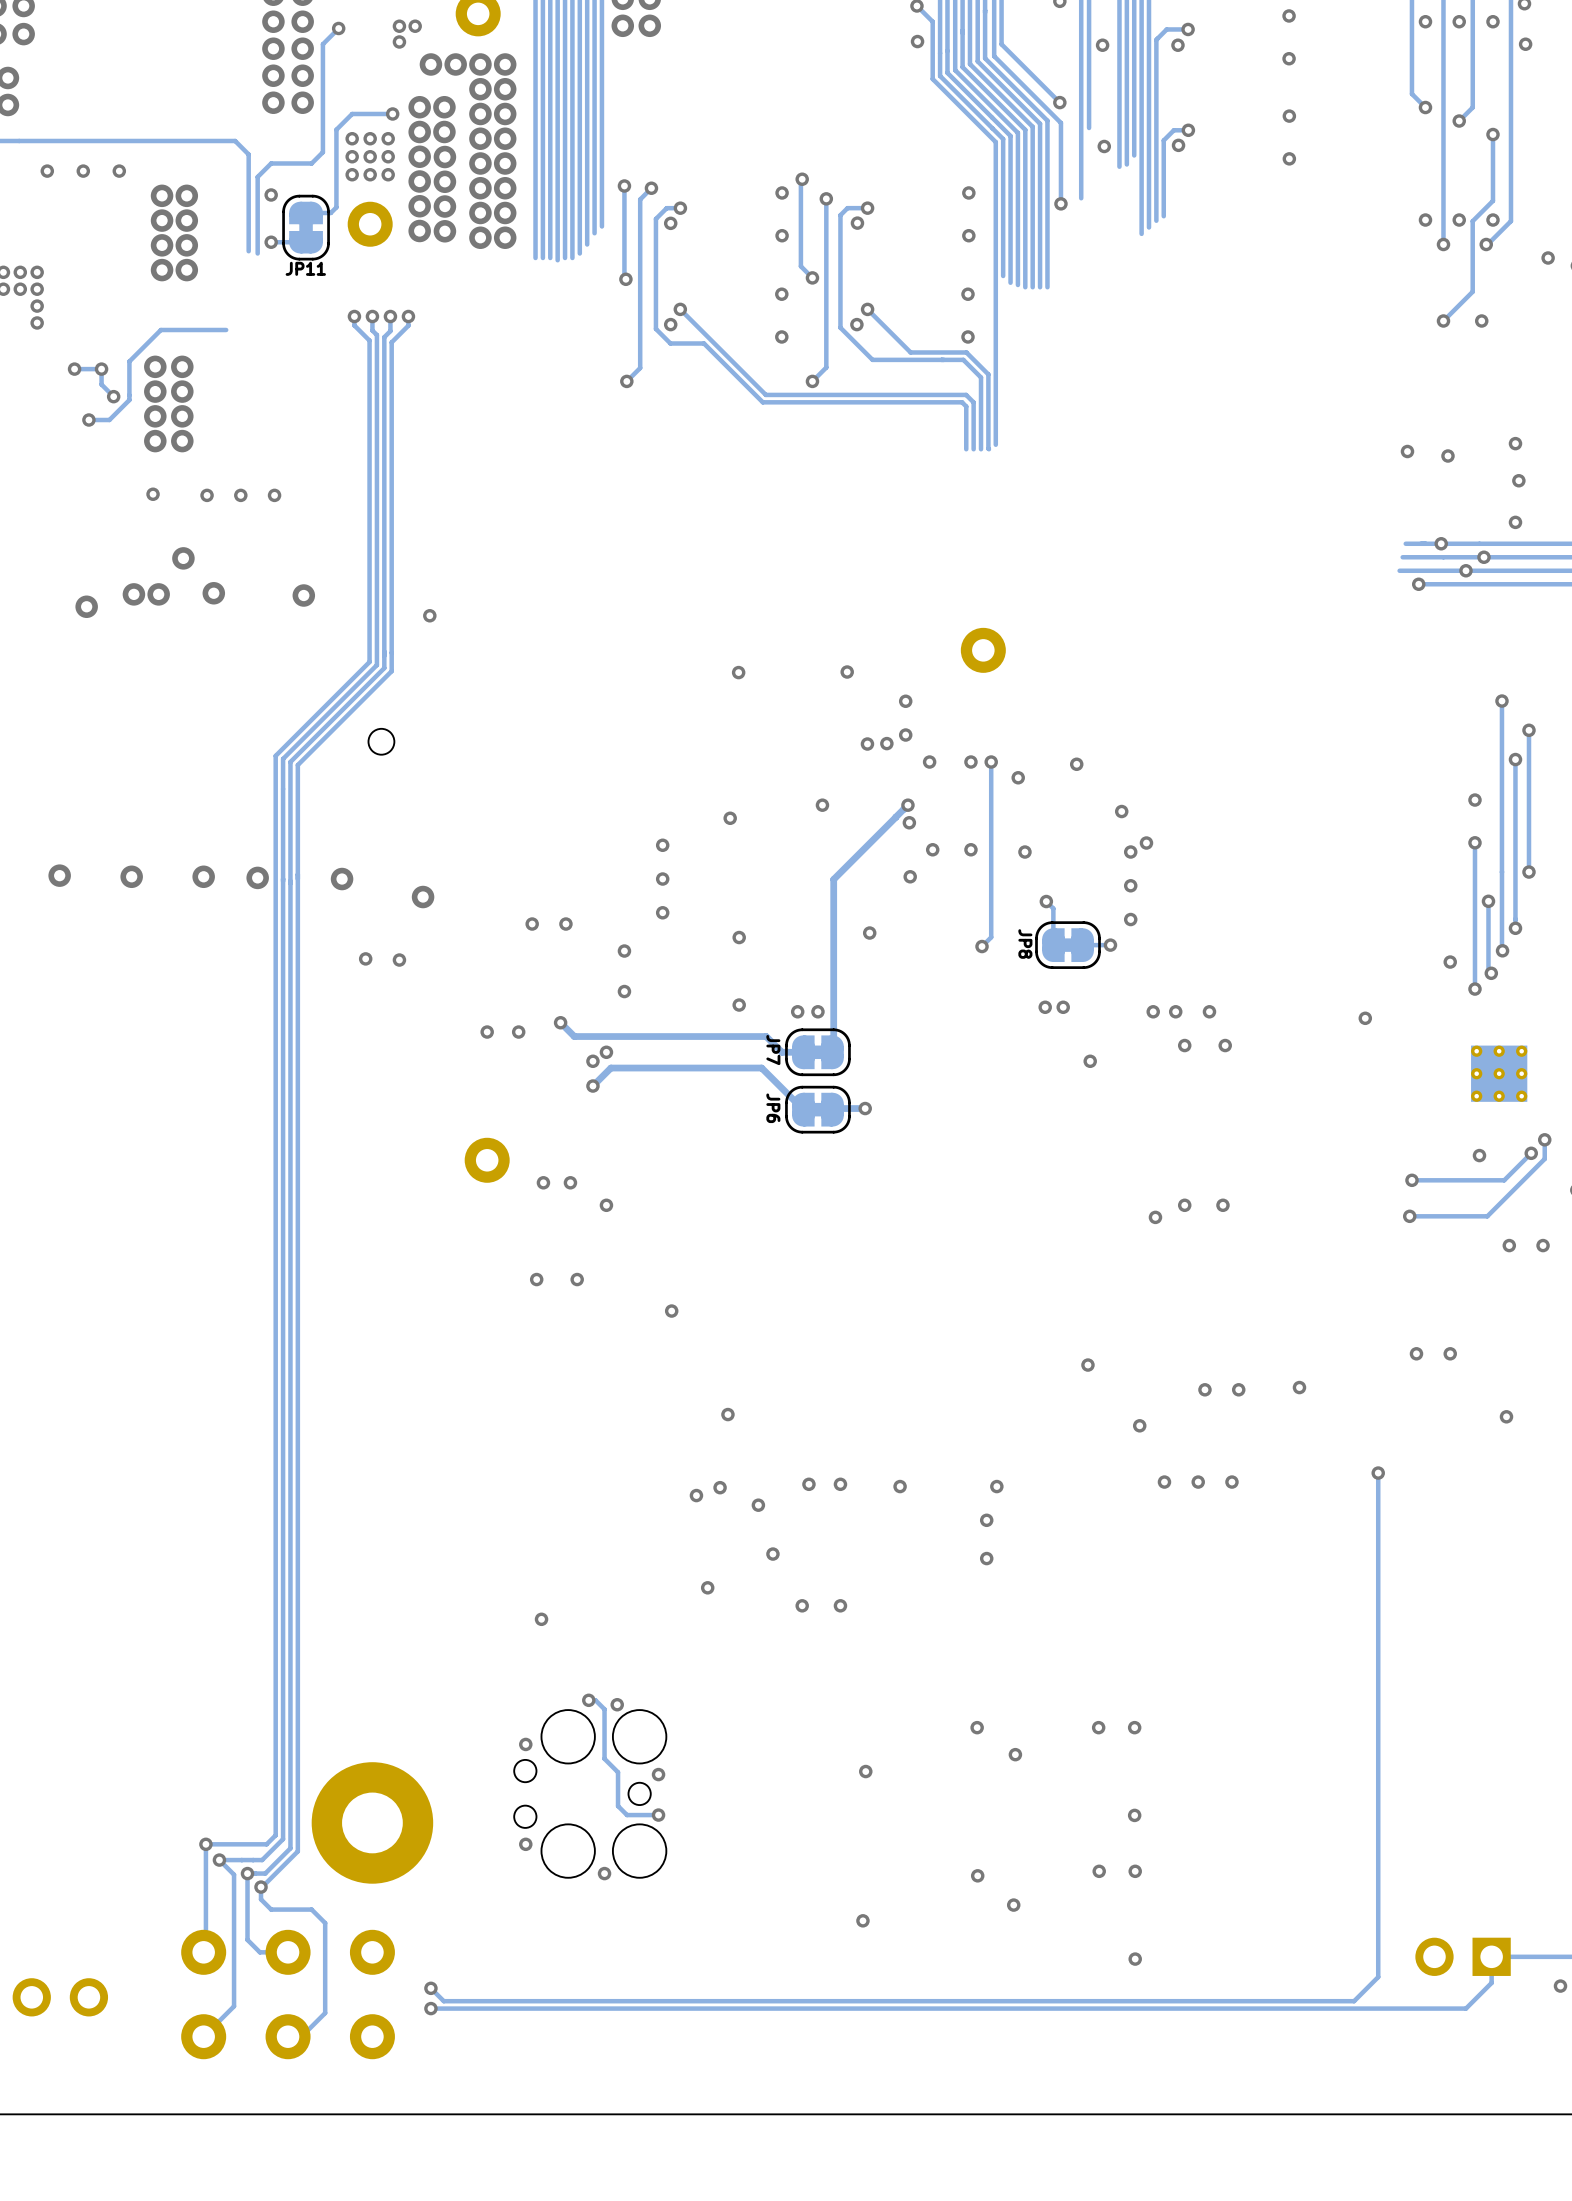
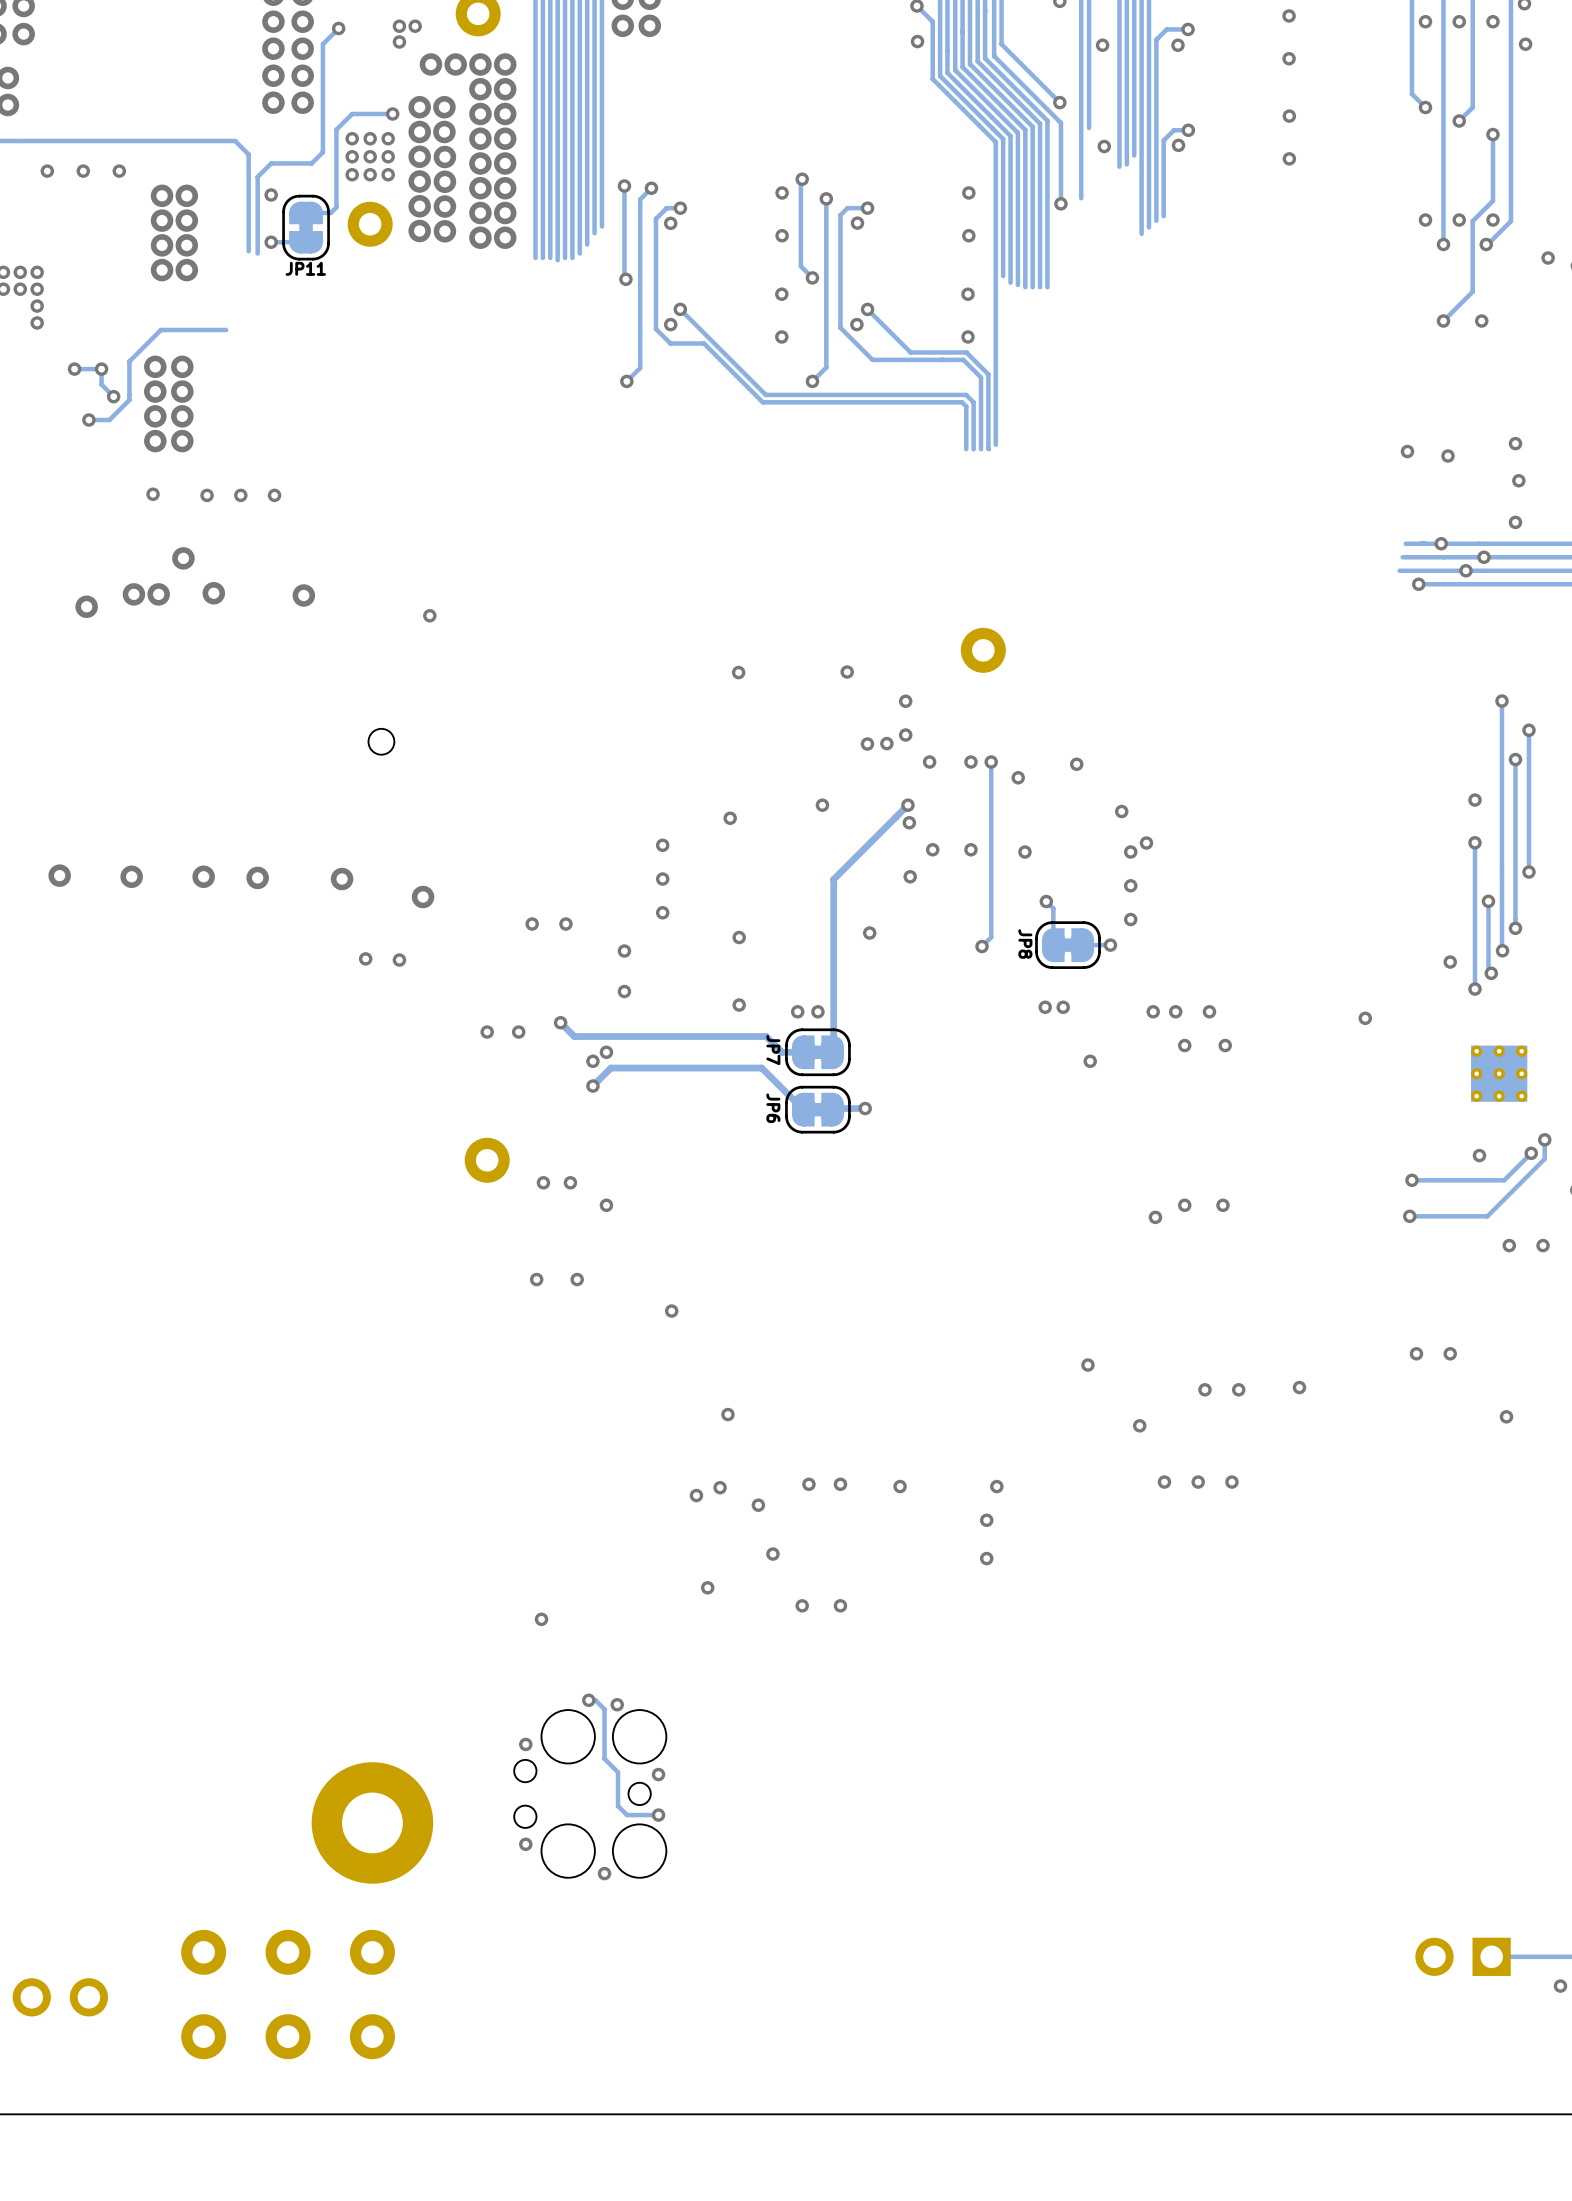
track: (354, 316) (354, 325) (369, 340) (369, 662) (275, 755) (275, 1835) (266, 1844) (205, 1844) (205, 1944) -> none
via: (354, 316) -> none
track: (372, 316) (372, 330) (376, 335) (376, 665) (283, 758) (283, 1839) (262, 1860) (219, 1860) (234, 1874) (234, 2006) (203, 2036) -> none
via: (372, 316) -> none
track: (390, 316) (390, 331) (384, 337) (384, 668) (290, 761) (290, 1848) (265, 1873) (247, 1873) (247, 1939) (259, 1952) (288, 1952) -> none
via: (390, 316) -> none
track: (408, 316) (408, 325) (391, 342) (391, 671) (297, 765) (297, 1851) (261, 1887) (261, 1899) (271, 1909) (311, 1909) (325, 1923) (325, 2013) (301, 2036) (288, 2036) -> none
via: (408, 316) -> none
track: (1378, 1473) (1378, 1977) (1354, 2001) (443, 2001) (430, 1988) -> none
via: (1378, 1473) -> none
via: (977, 1727) -> none
via: (1098, 1727) -> none
via: (1134, 1727) -> none
via: (1015, 1754) -> none
via: (865, 1771) -> none
via: (1134, 1815) -> none
via: (205, 1844) -> none
via: (219, 1860) -> none
via: (1099, 1871) -> none
via: (1135, 1871) -> none
via: (247, 1873) -> none
via: (977, 1875) -> none
via: (261, 1887) -> none
via: (1013, 1905) -> none
via: (862, 1920) -> none
track: (1491, 1956) (1491, 1982) (1465, 2008) (430, 2008) -> none
via: (1135, 1959) -> none
via: (430, 1988) -> none
via: (430, 2008) -> none

